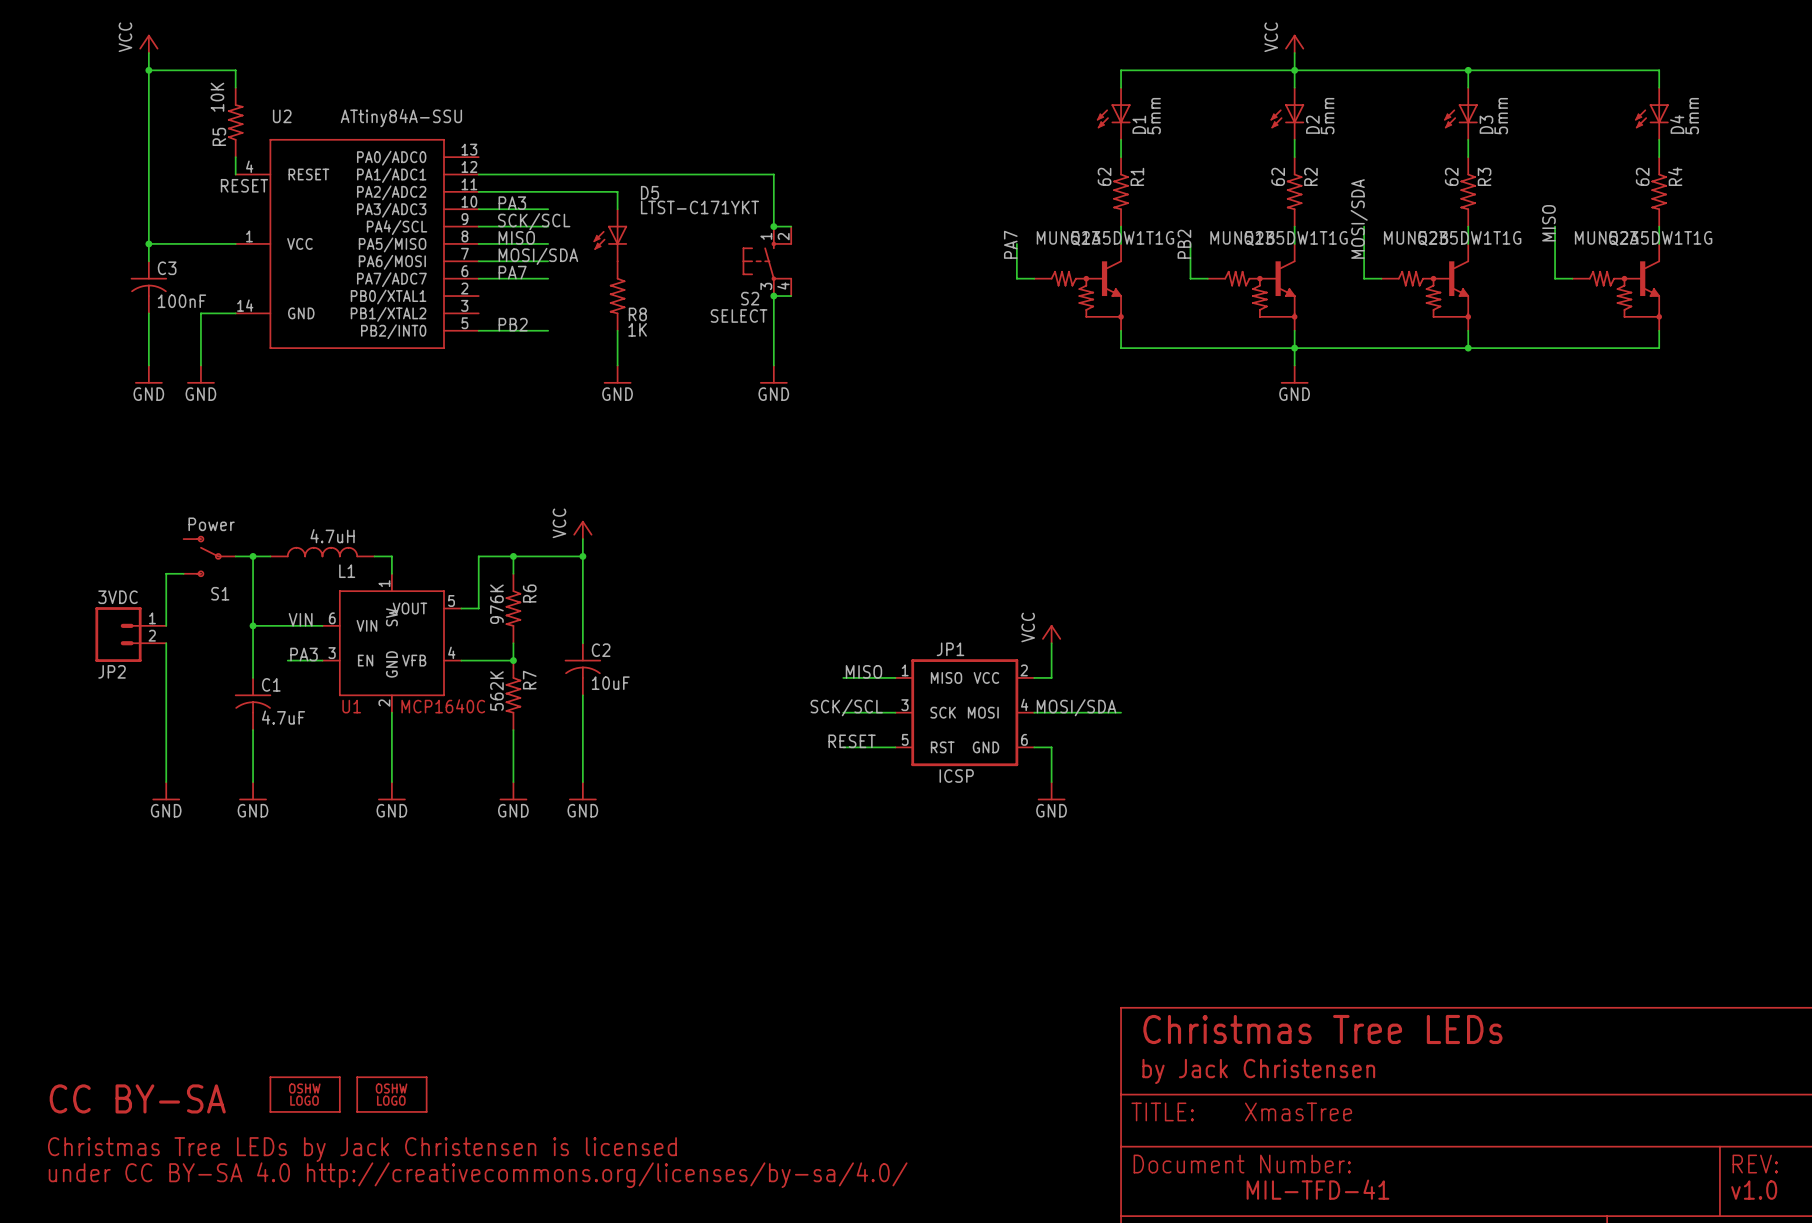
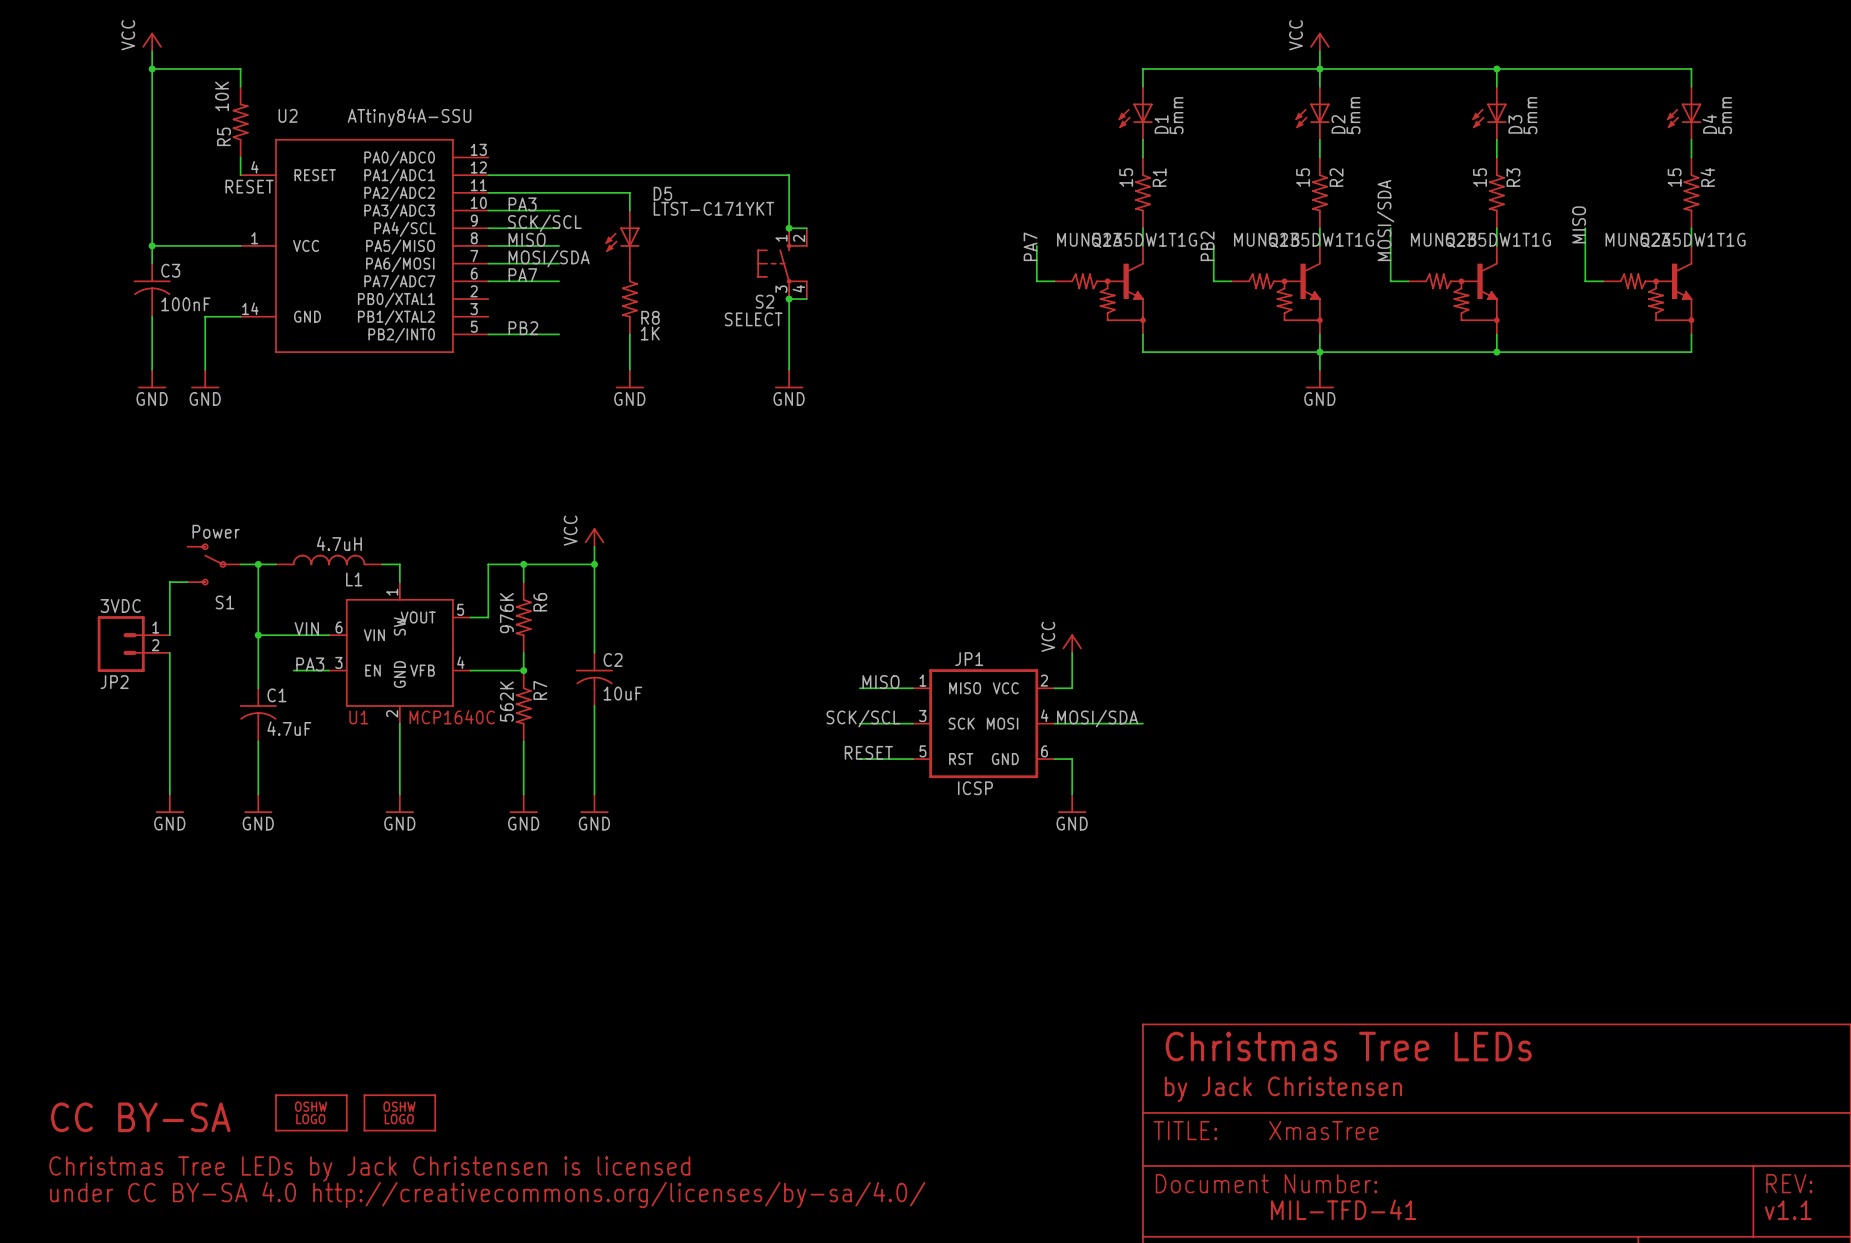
R1 value: 62 (1104, 176) -> 15 (1126, 177)
R2 value: 62 (1278, 176) -> 15 (1303, 177)
R3 value: 62 (1451, 176) -> 15 (1480, 177)
R4 value: 62 (1642, 176) -> 15 (1674, 177)
text: v1.0 (1754, 1190) -> v1.1 (1788, 1210)

